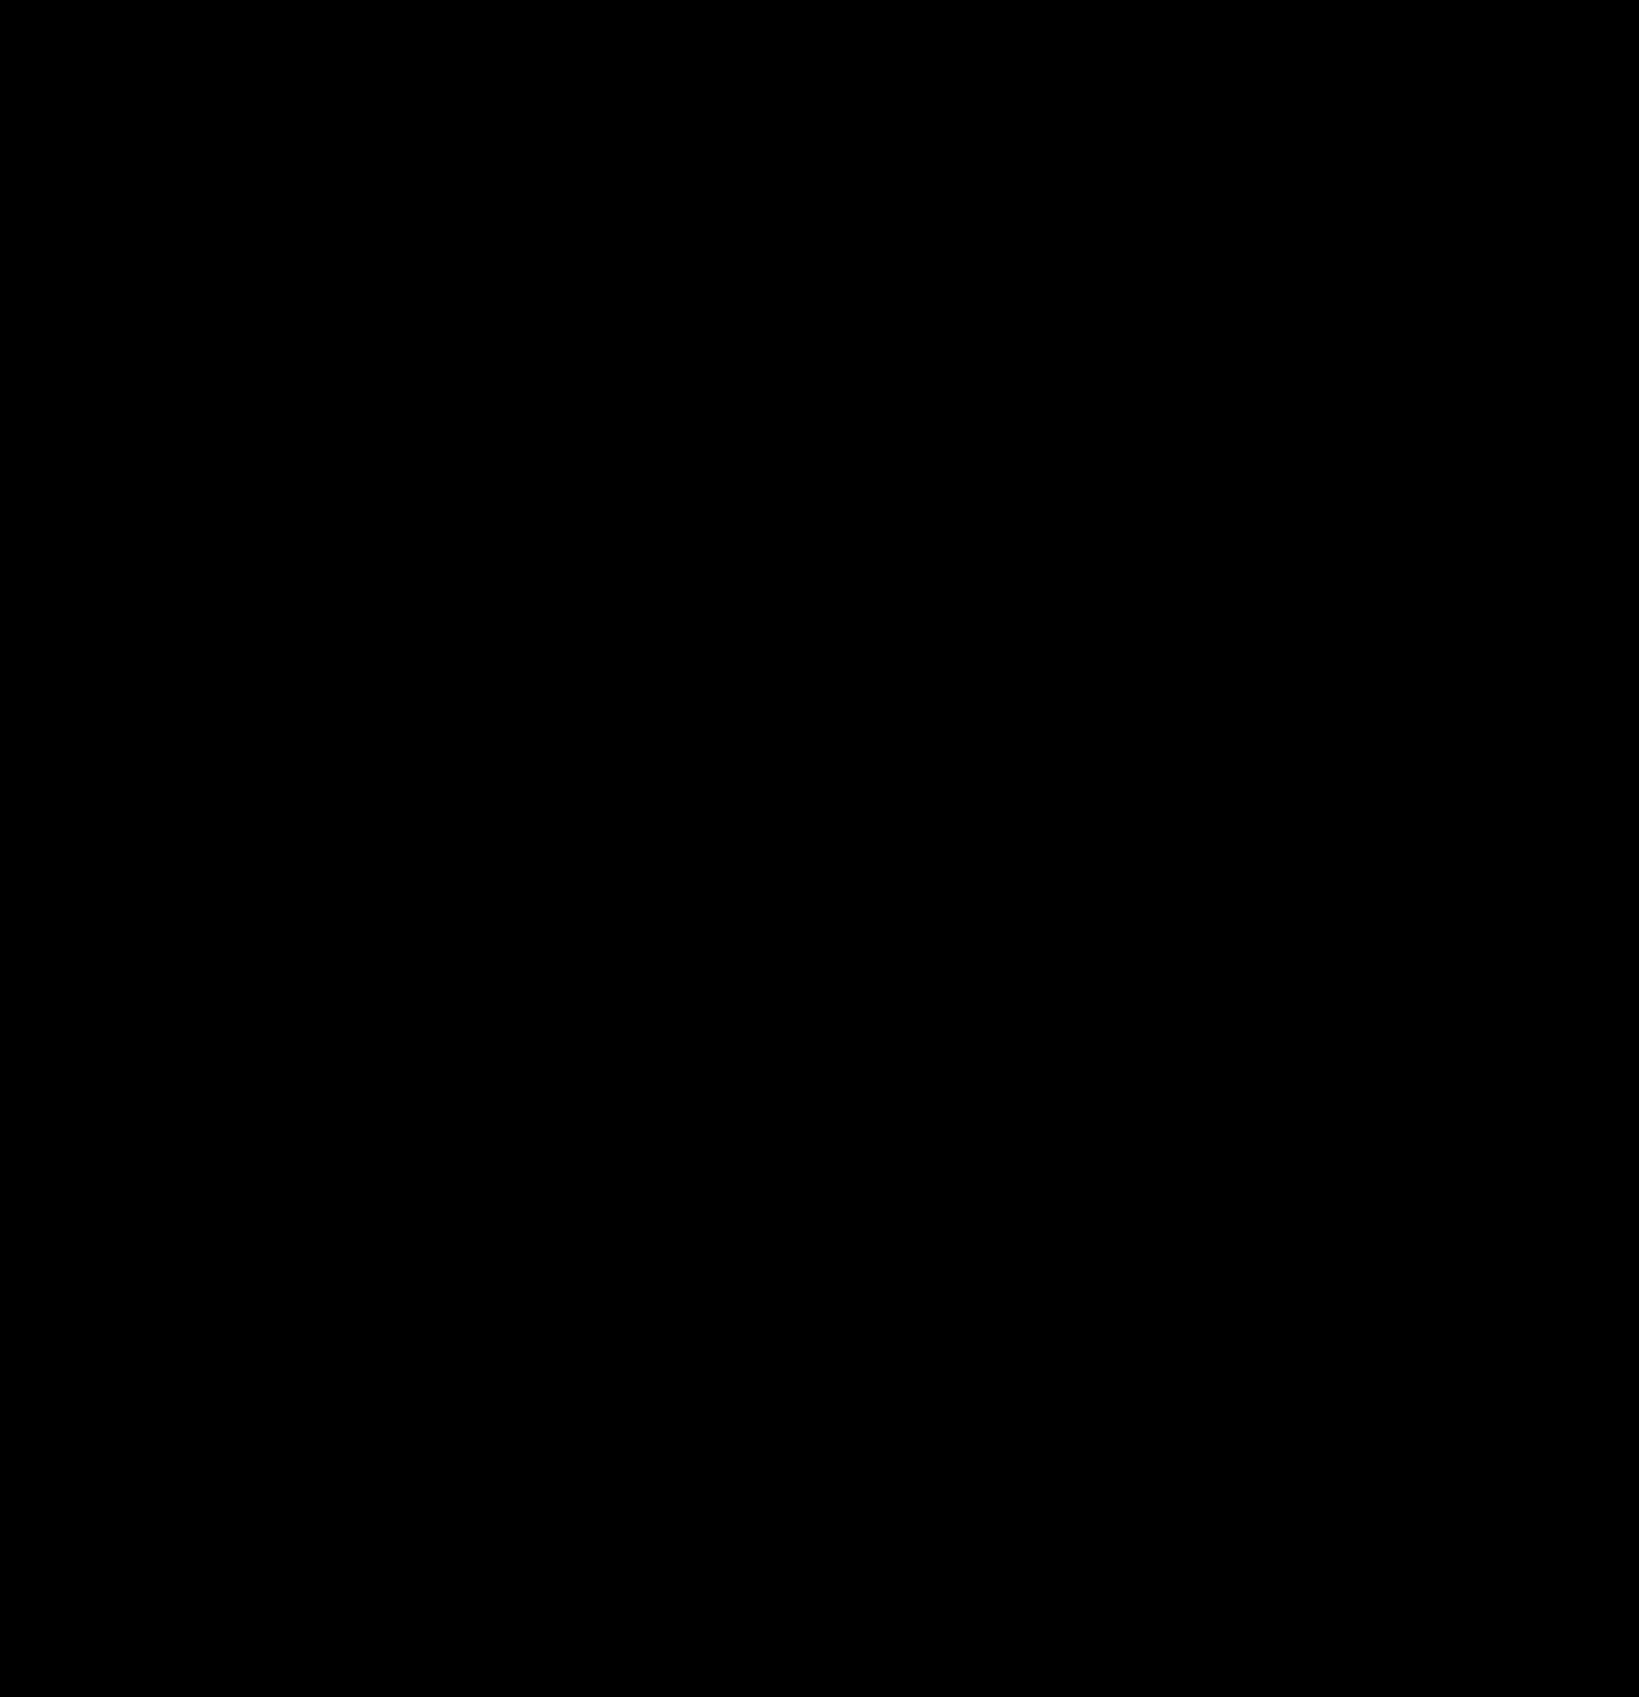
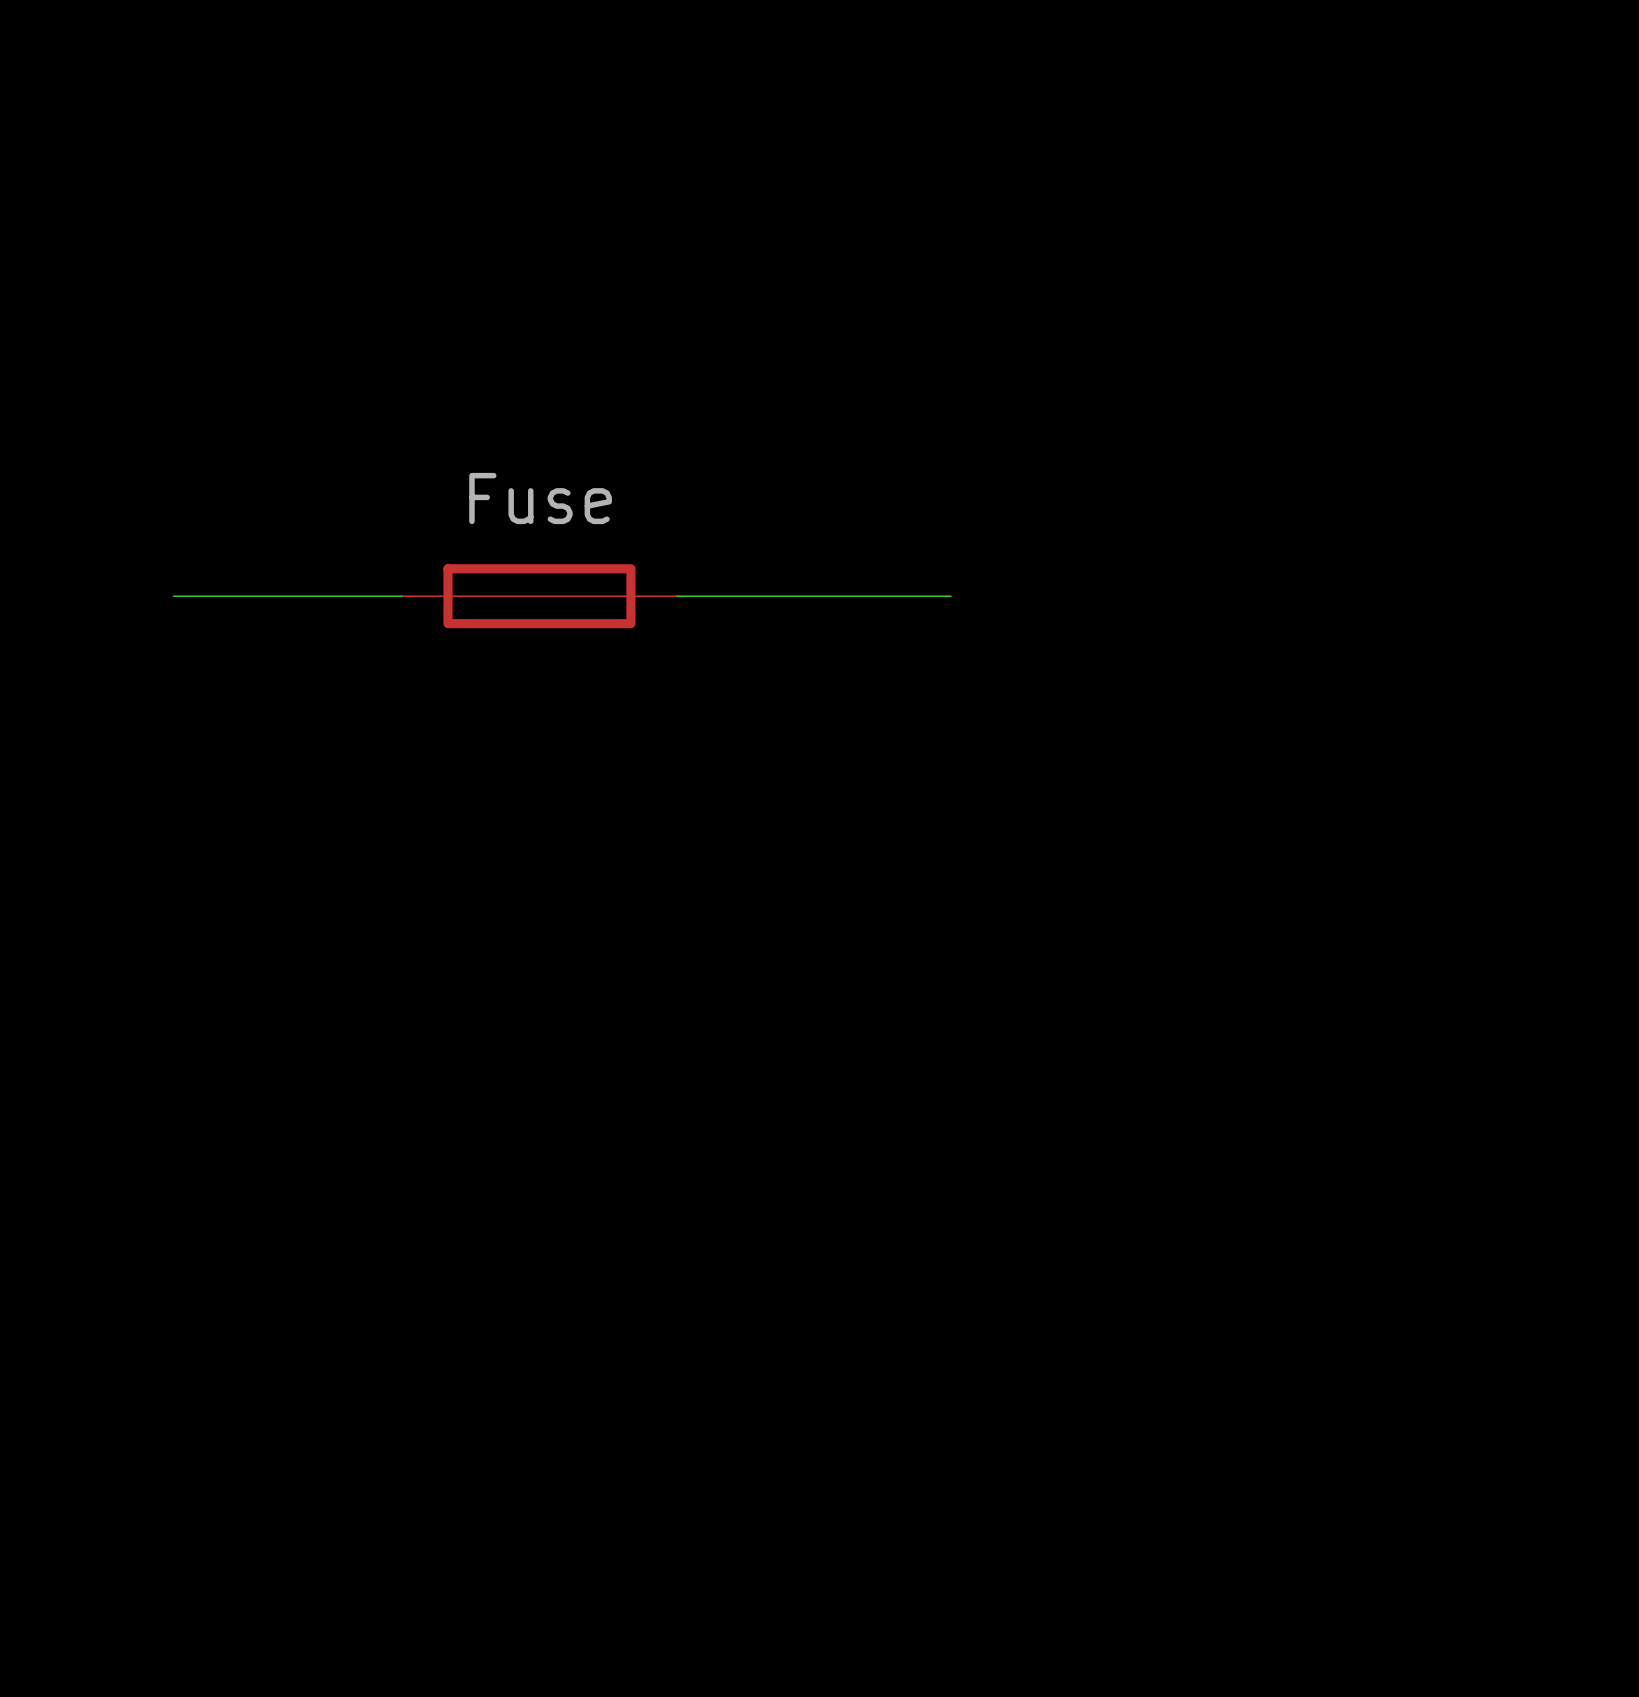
wire: none -> (173, 596) (402, 596)
part: none -> Fuse (539, 596)
wire: none -> (676, 596) (950, 596)

